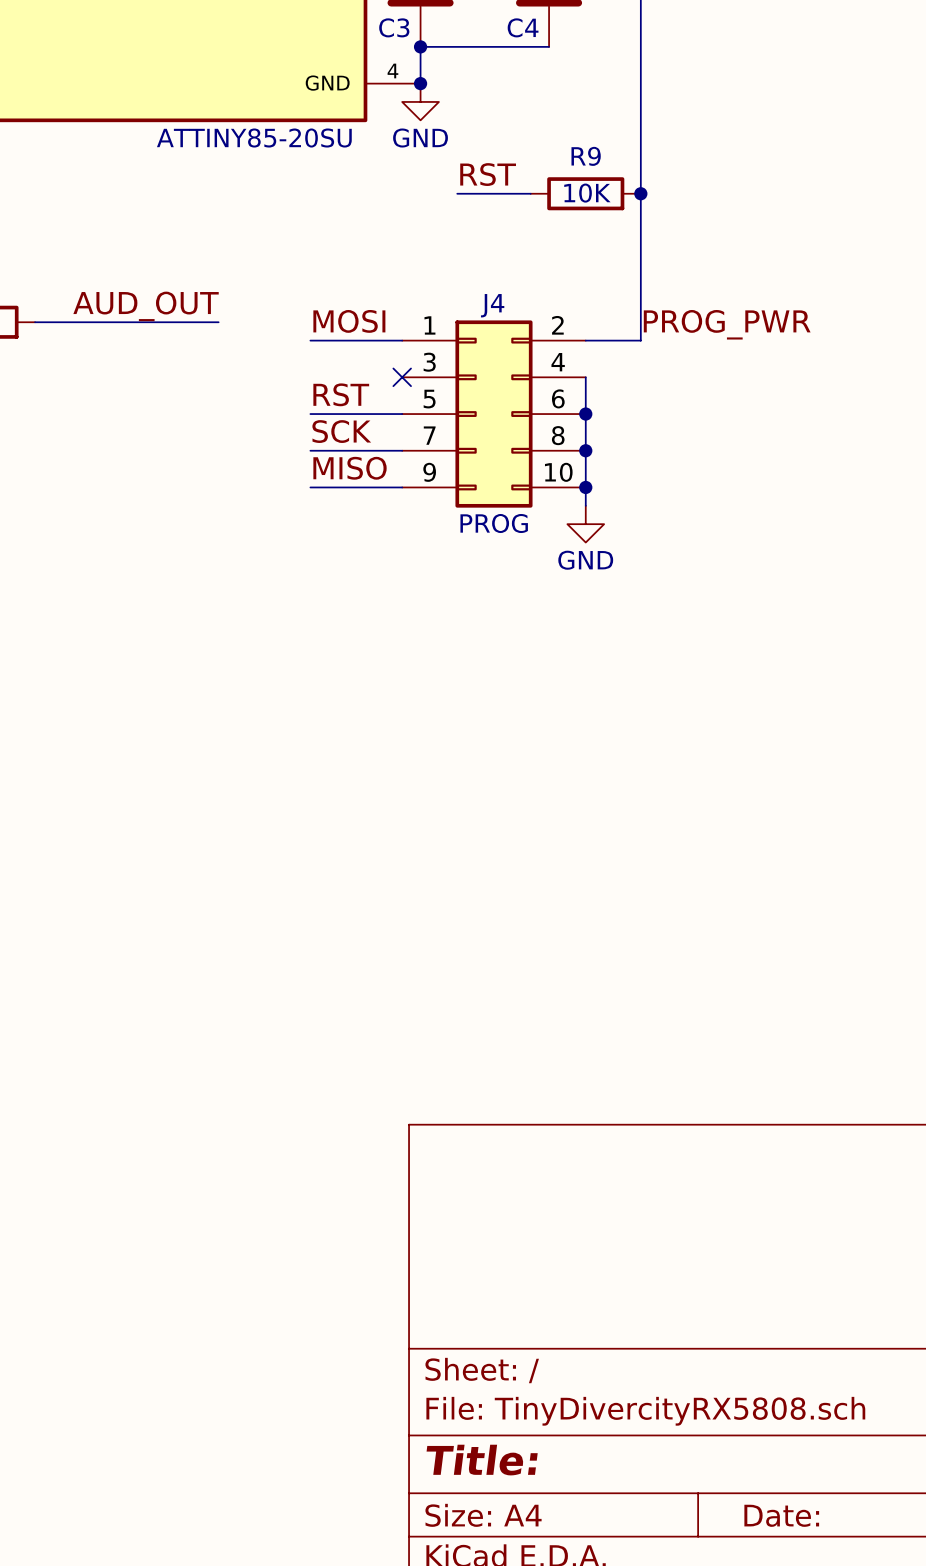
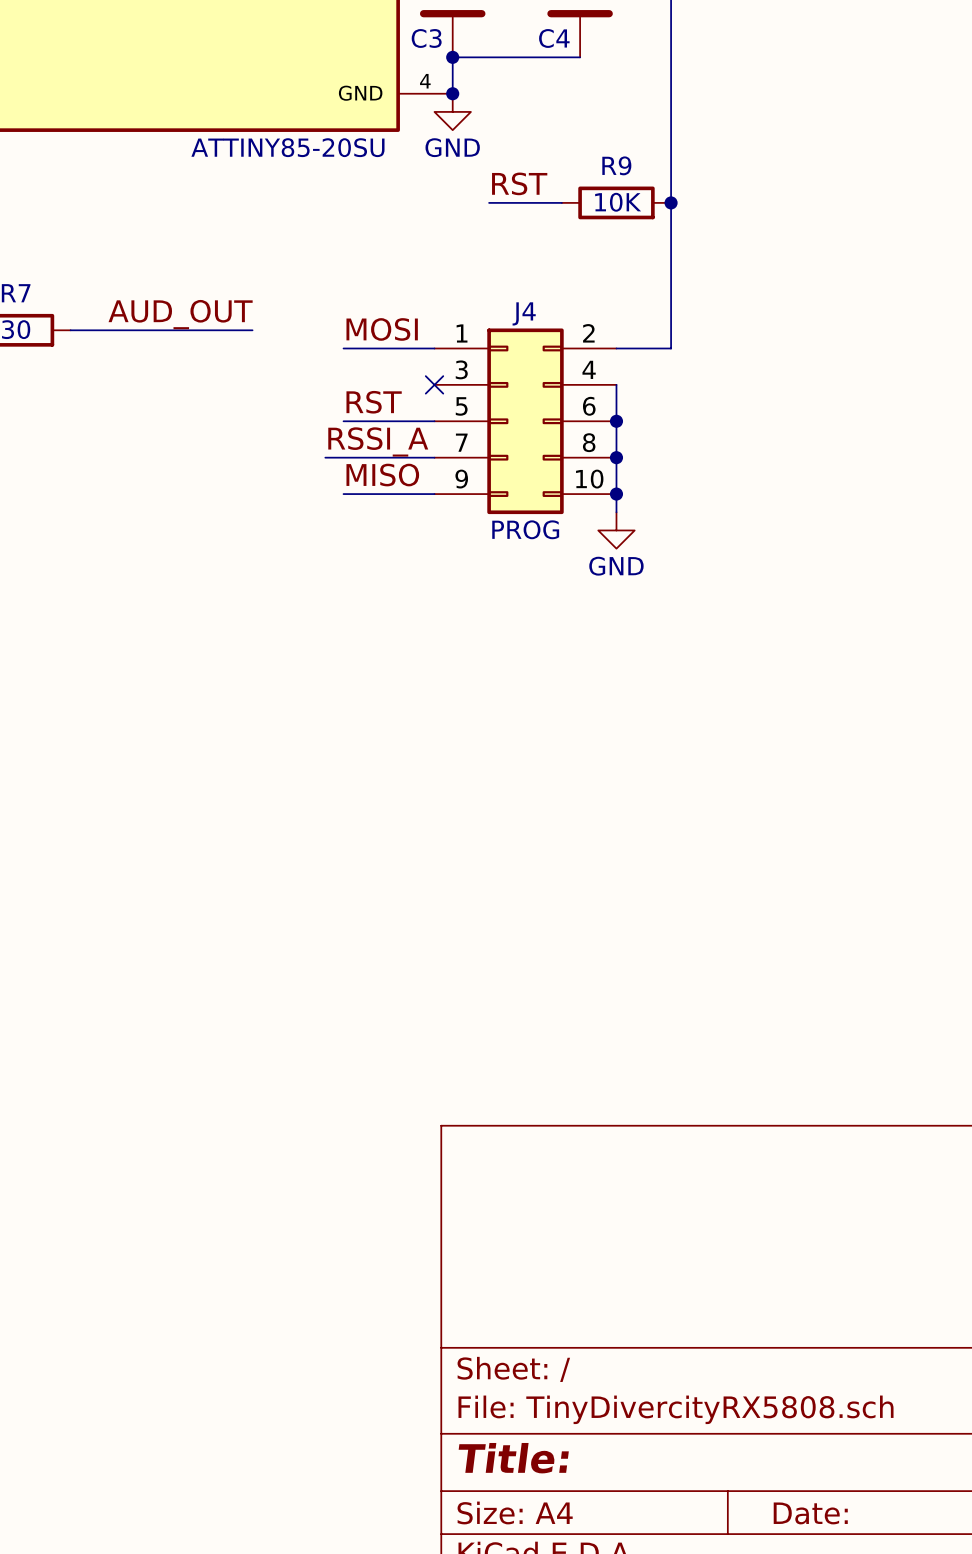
label: PROG_PWR (727, 324) -> none
label: SCK (341, 431) -> none
label: none -> RSSI_A (378, 441)
wire: none -> (325, 457) (343, 457)

